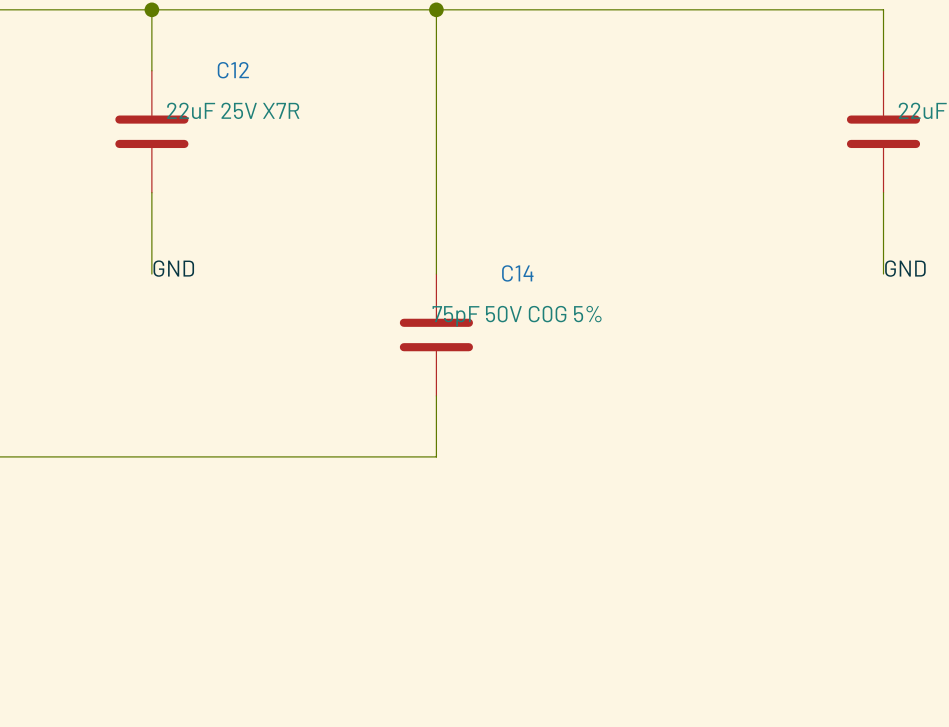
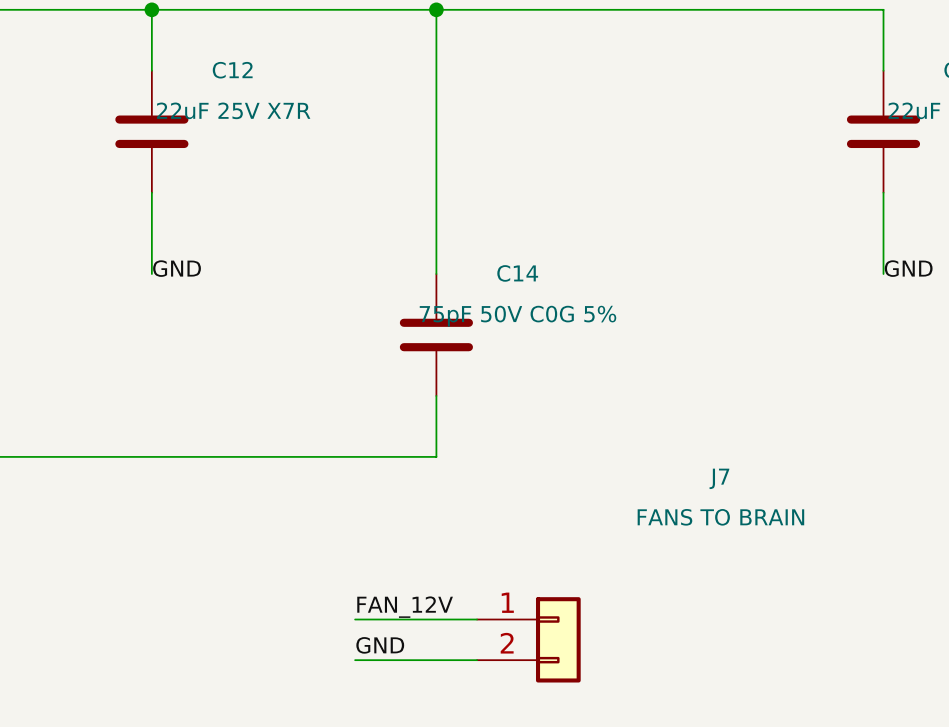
label: none -> FAN_12V (405, 607)
wire: none -> (355, 619) (477, 619)
J7: none -> FANS TO BRAIN (528, 639)
label: none -> GND (380, 645)
wire: none -> (355, 660) (477, 660)

